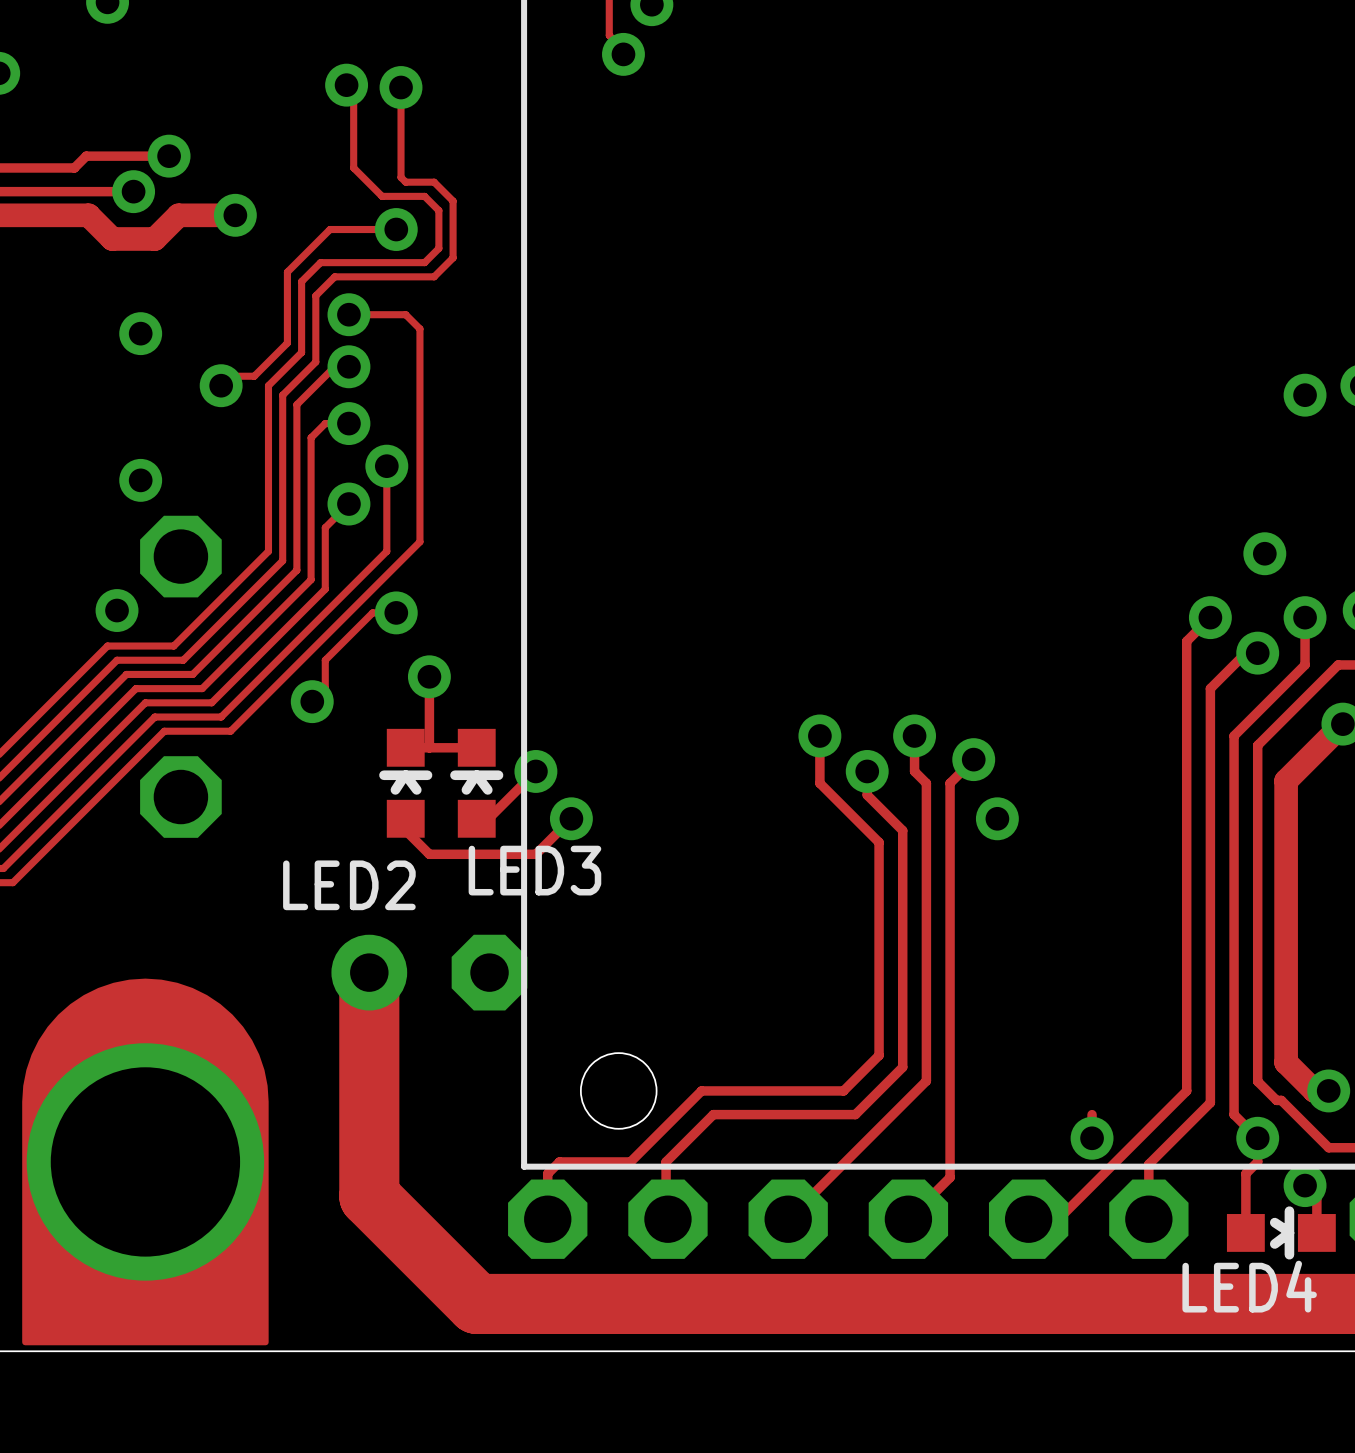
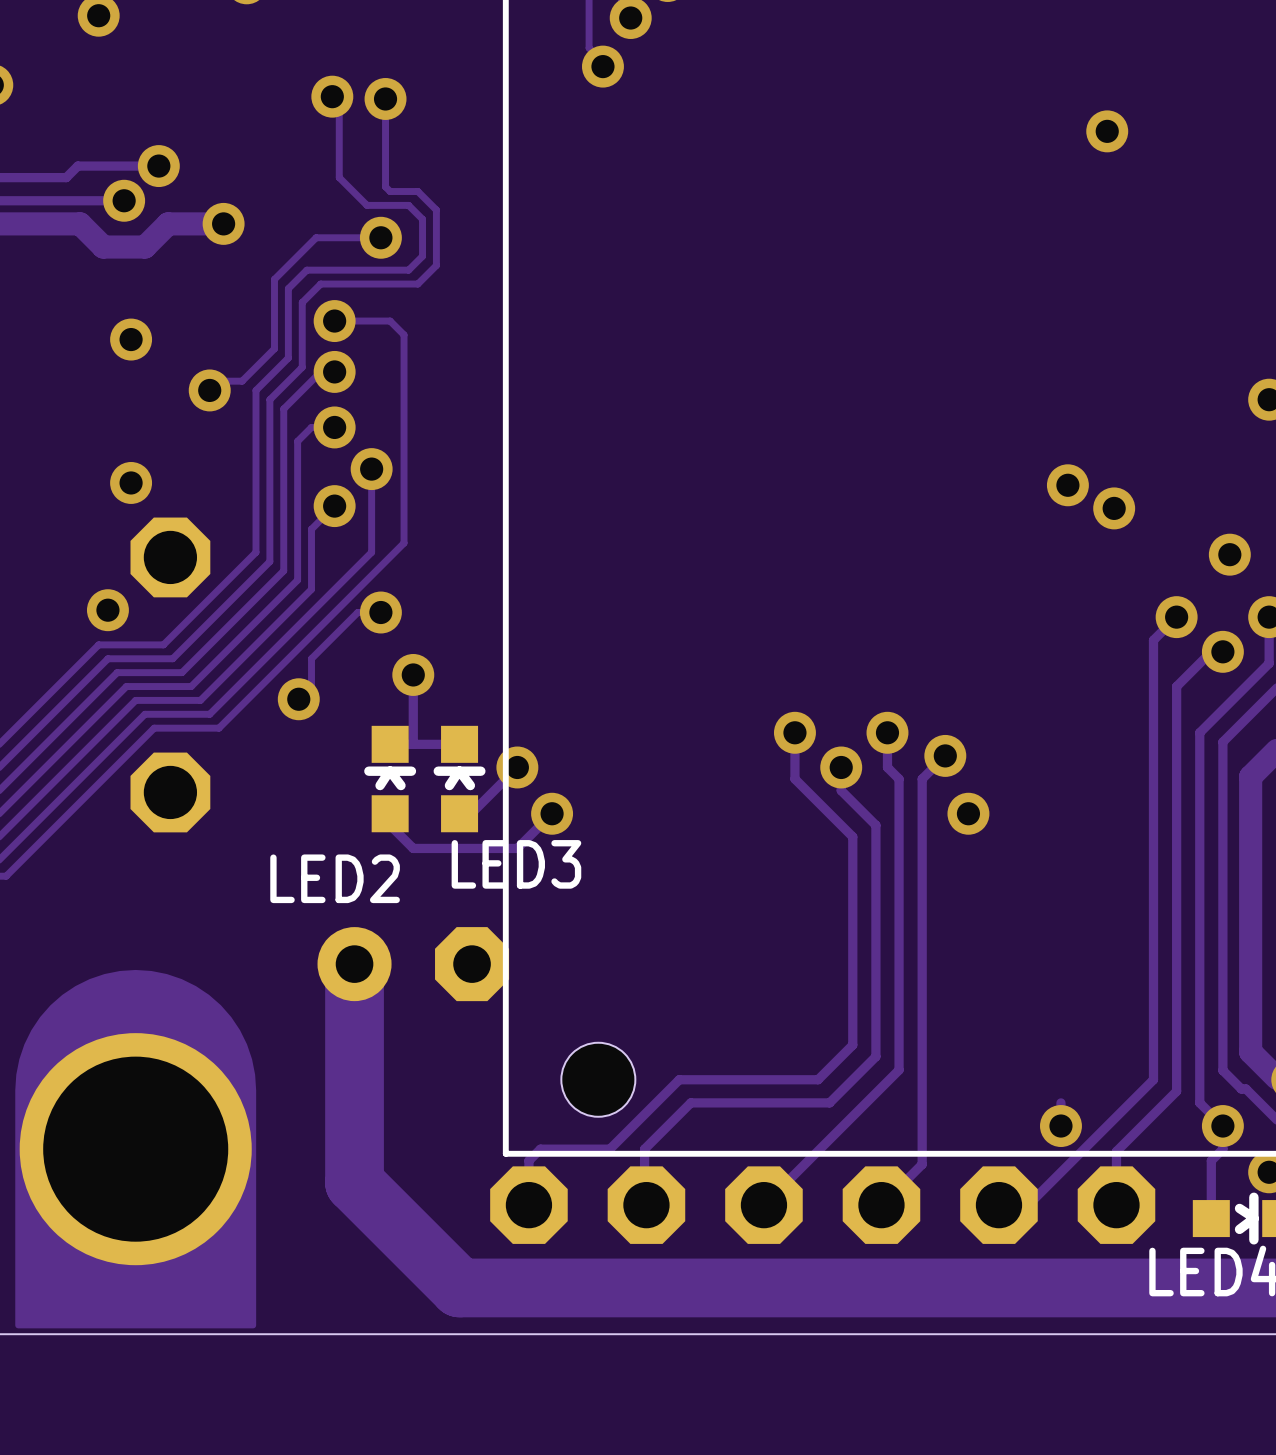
via: none -> (1107, 131)
via: none -> (1067, 485)
via: none -> (1114, 508)

